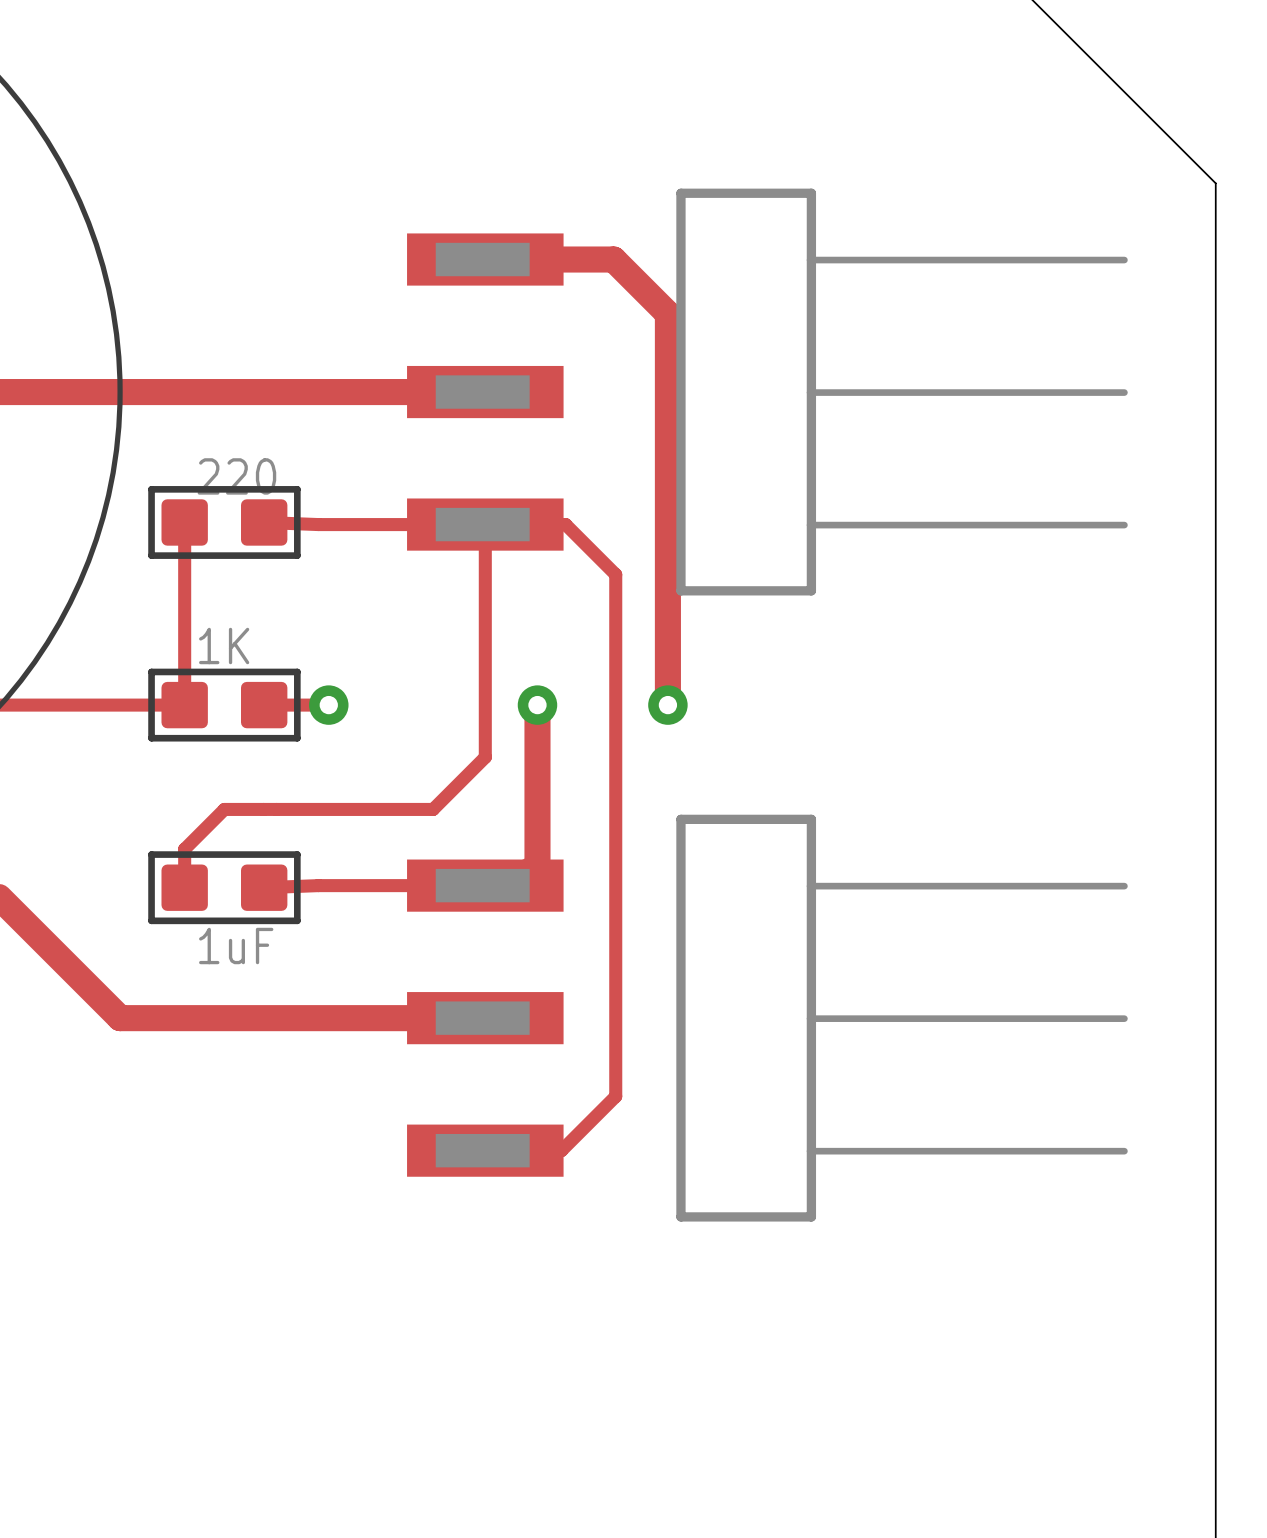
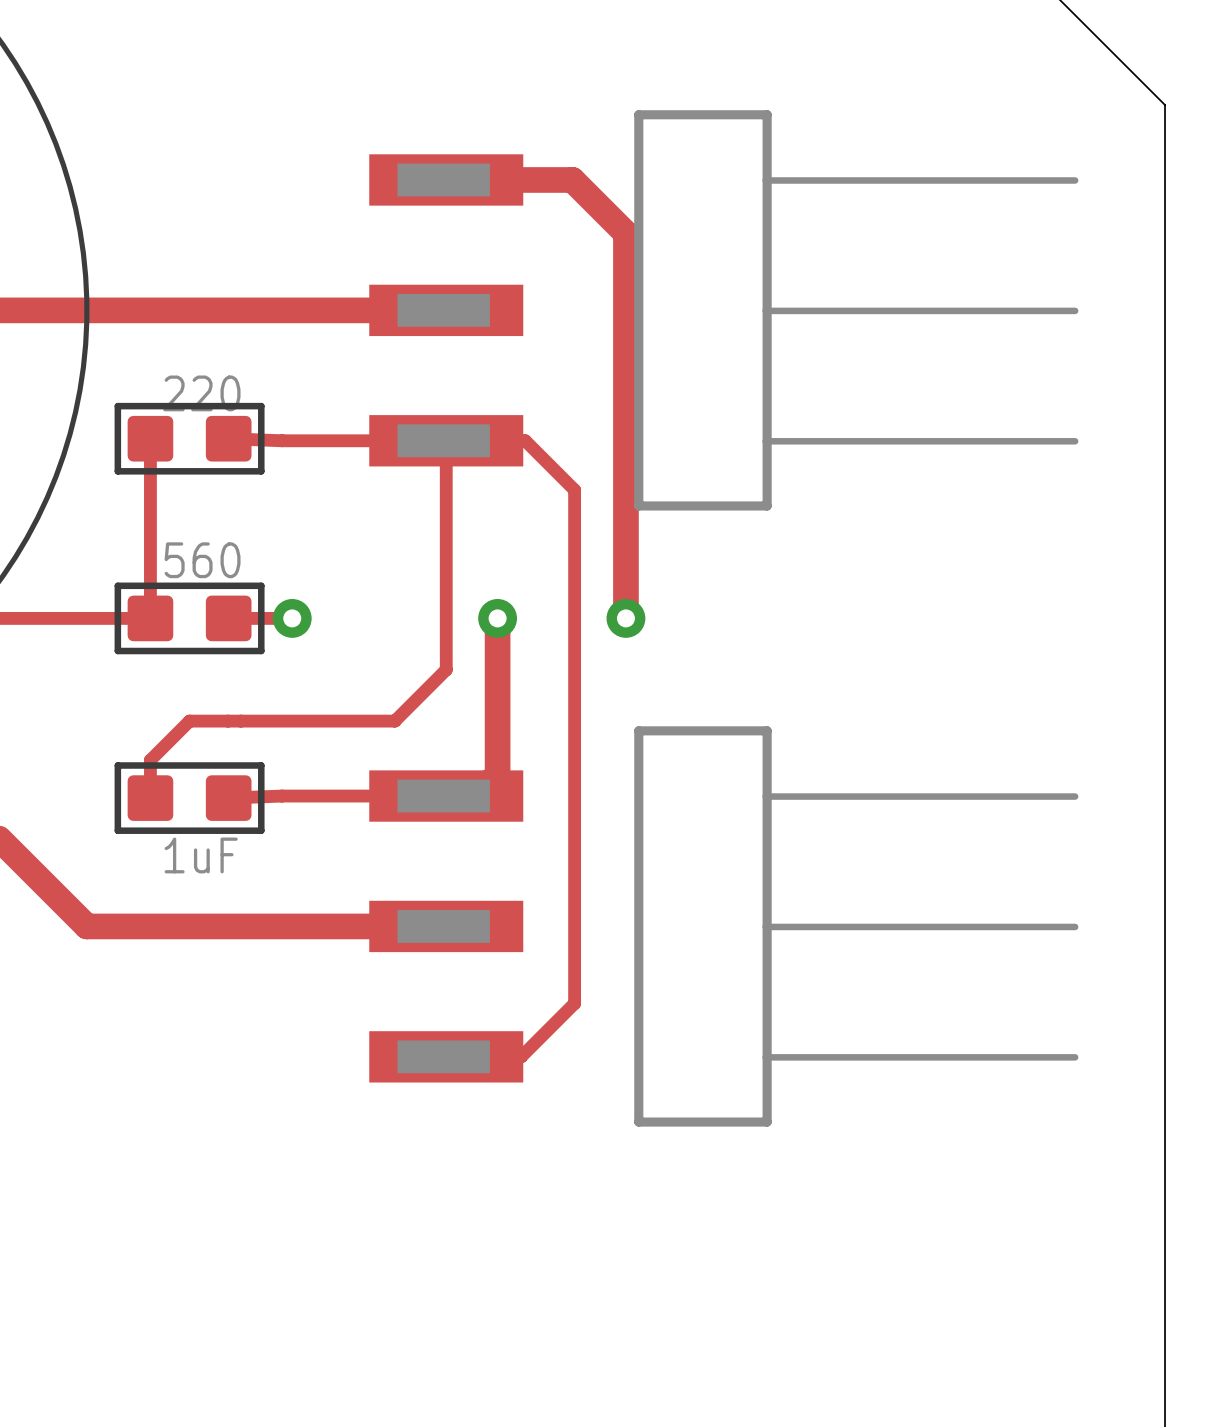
part value: 1K (224, 646) -> 560 (202, 560)

